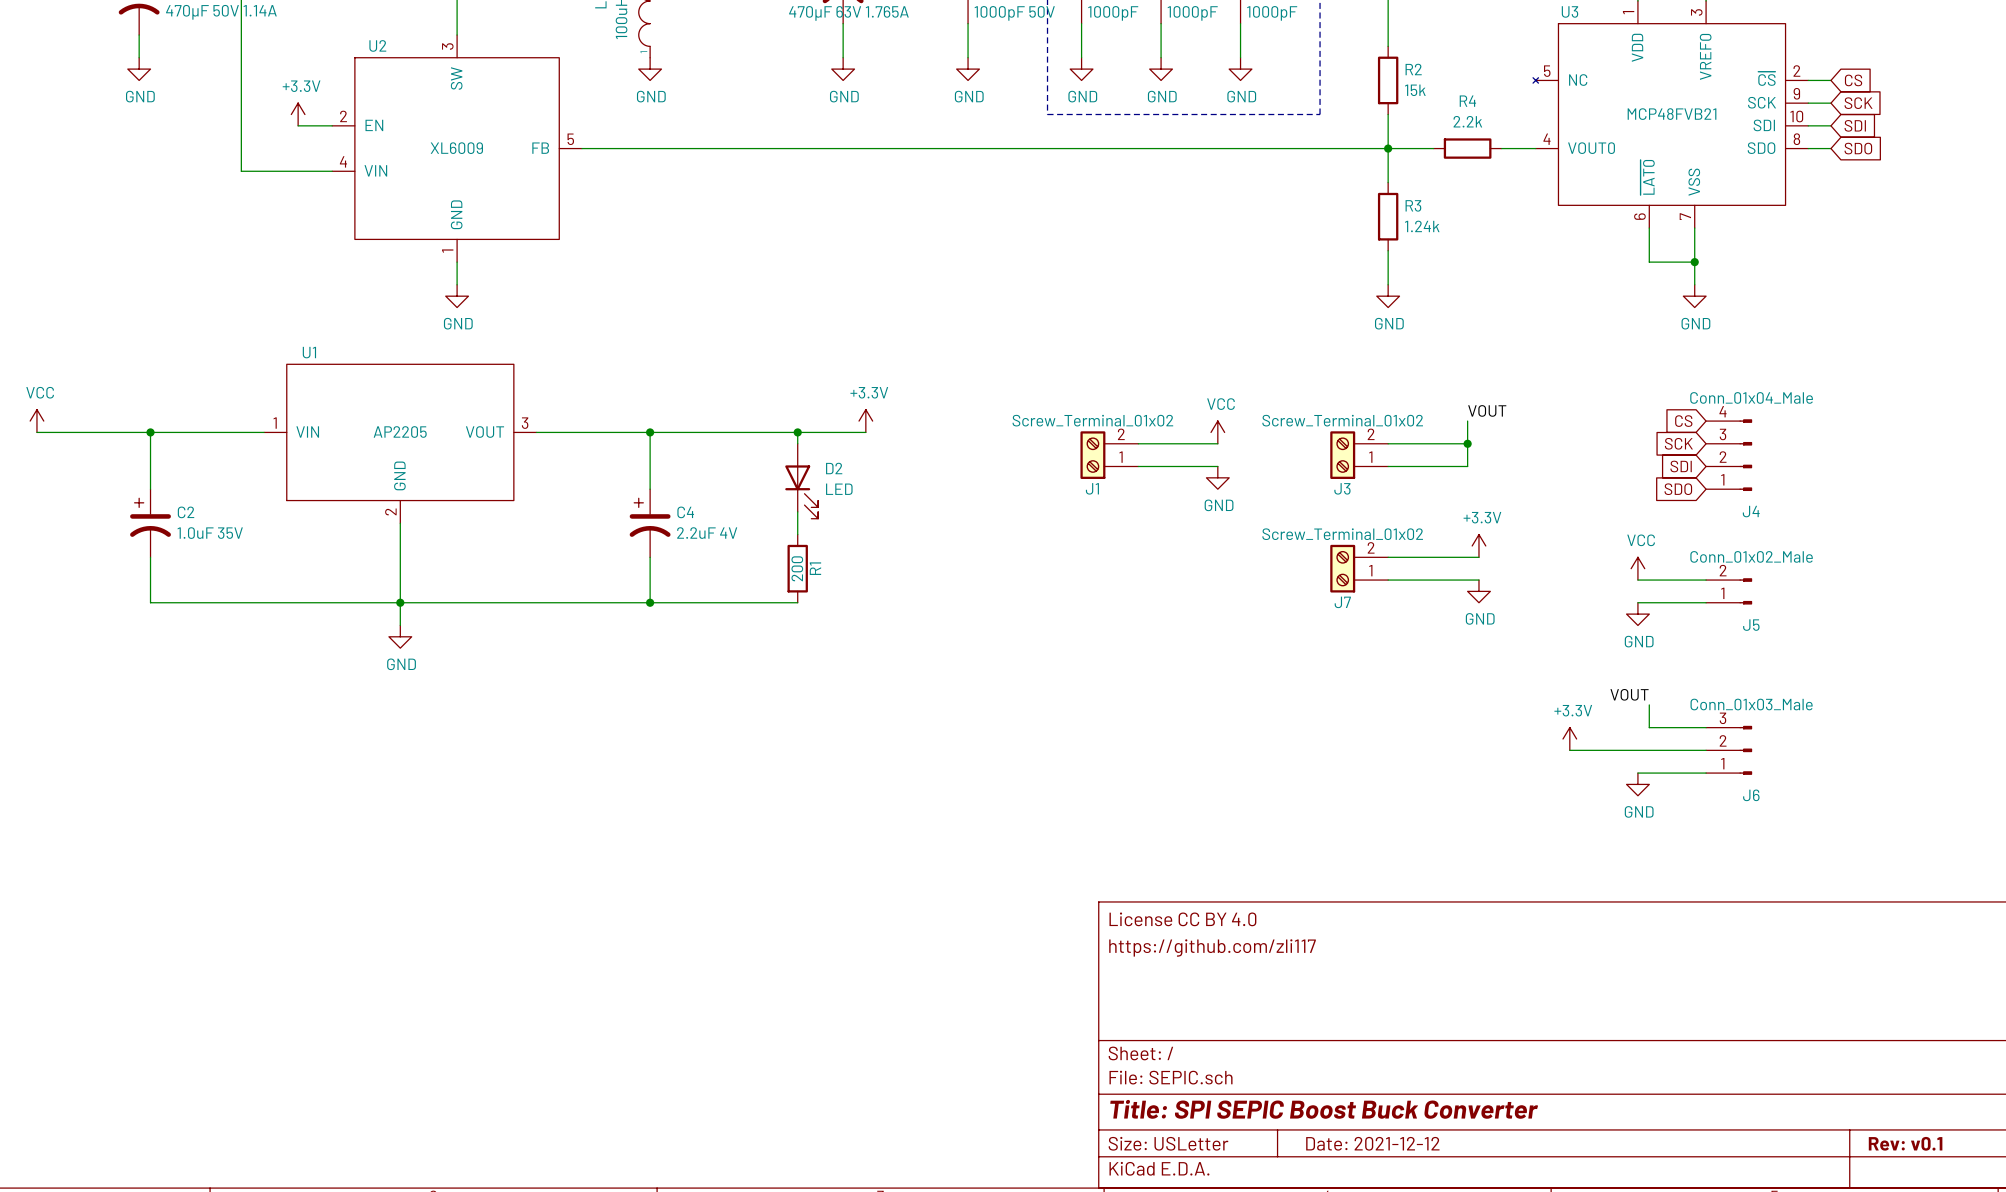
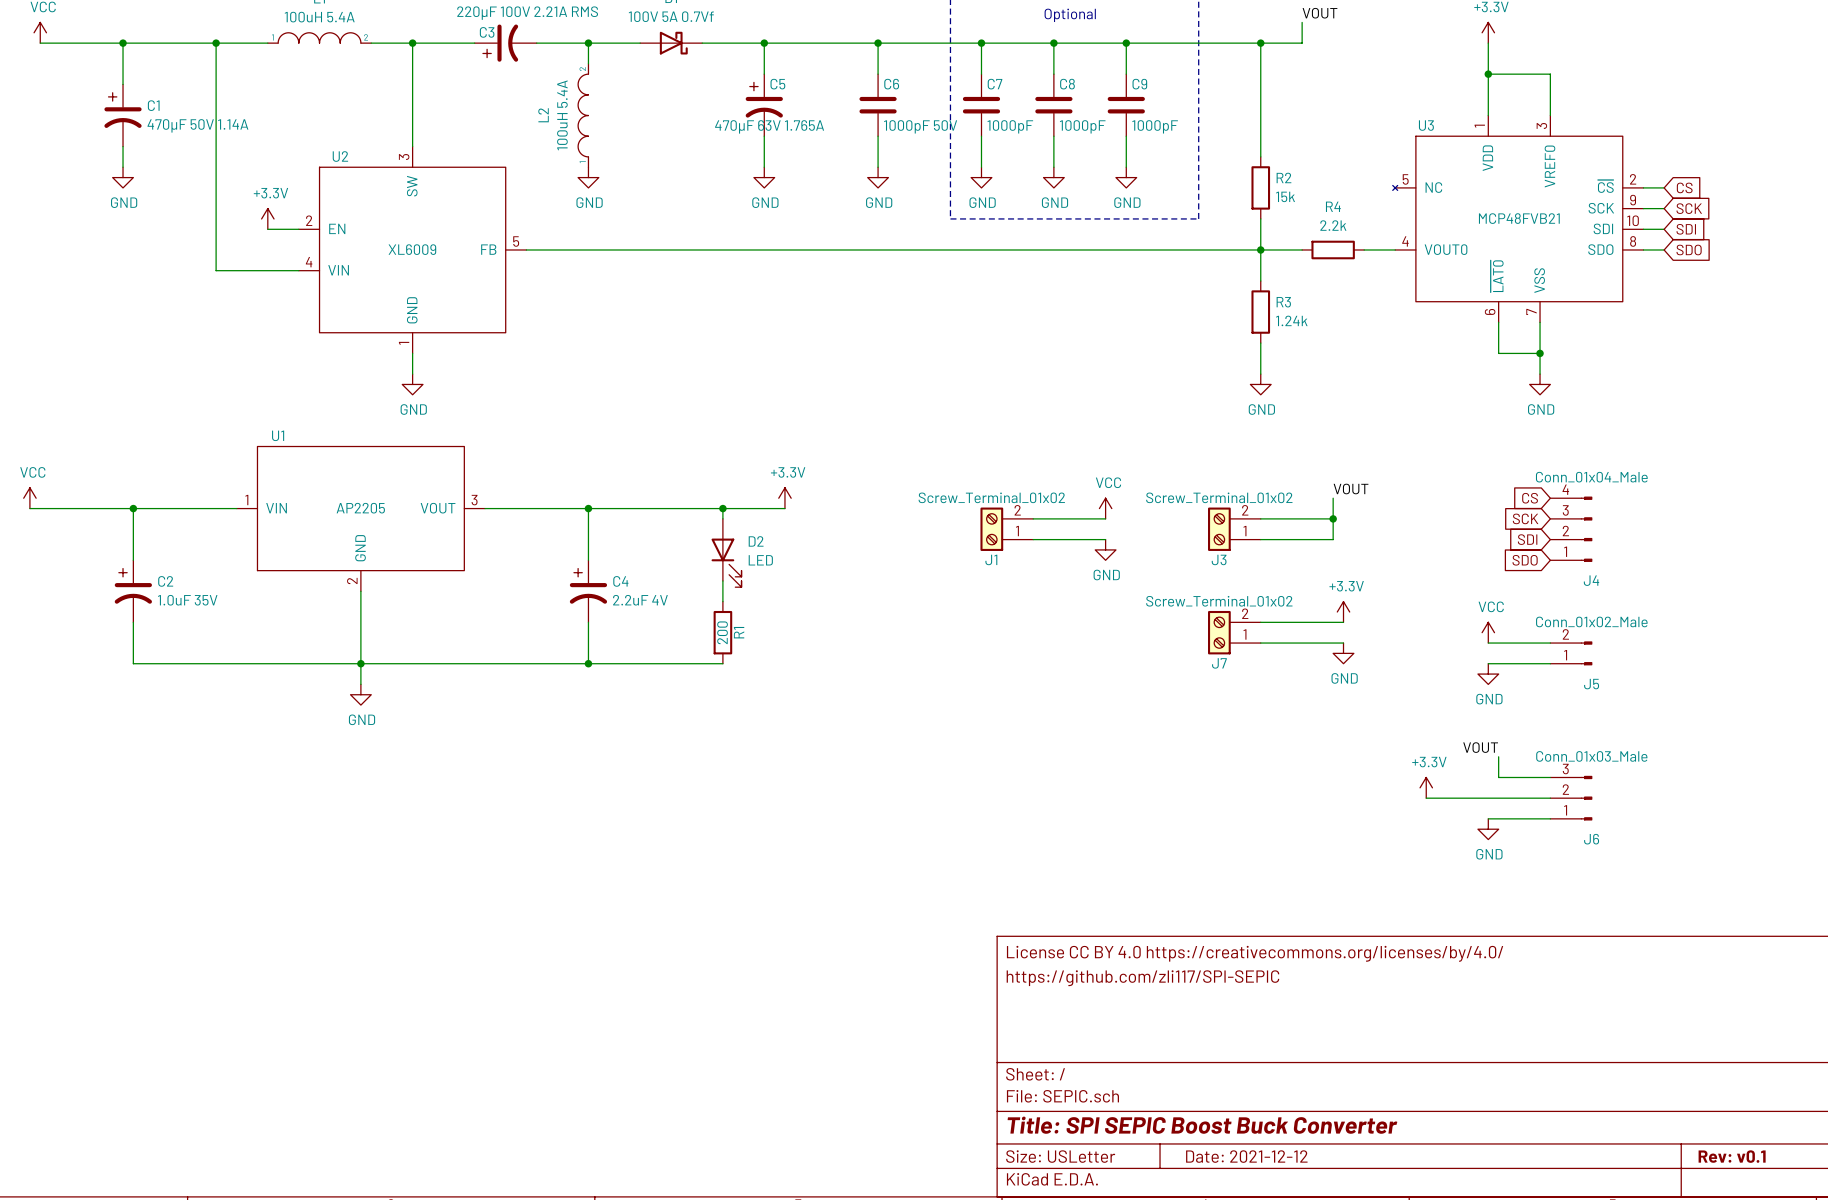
title block: License CC BY 4.0 (1182, 919) -> License CC BY 4.0 https://creativecommons.org/licenses/by/4.0/ (1255, 953)
title block: https://github.com/zli117 (1212, 947) -> https://github.com/zli117/SPI-SEPIC (1142, 978)

